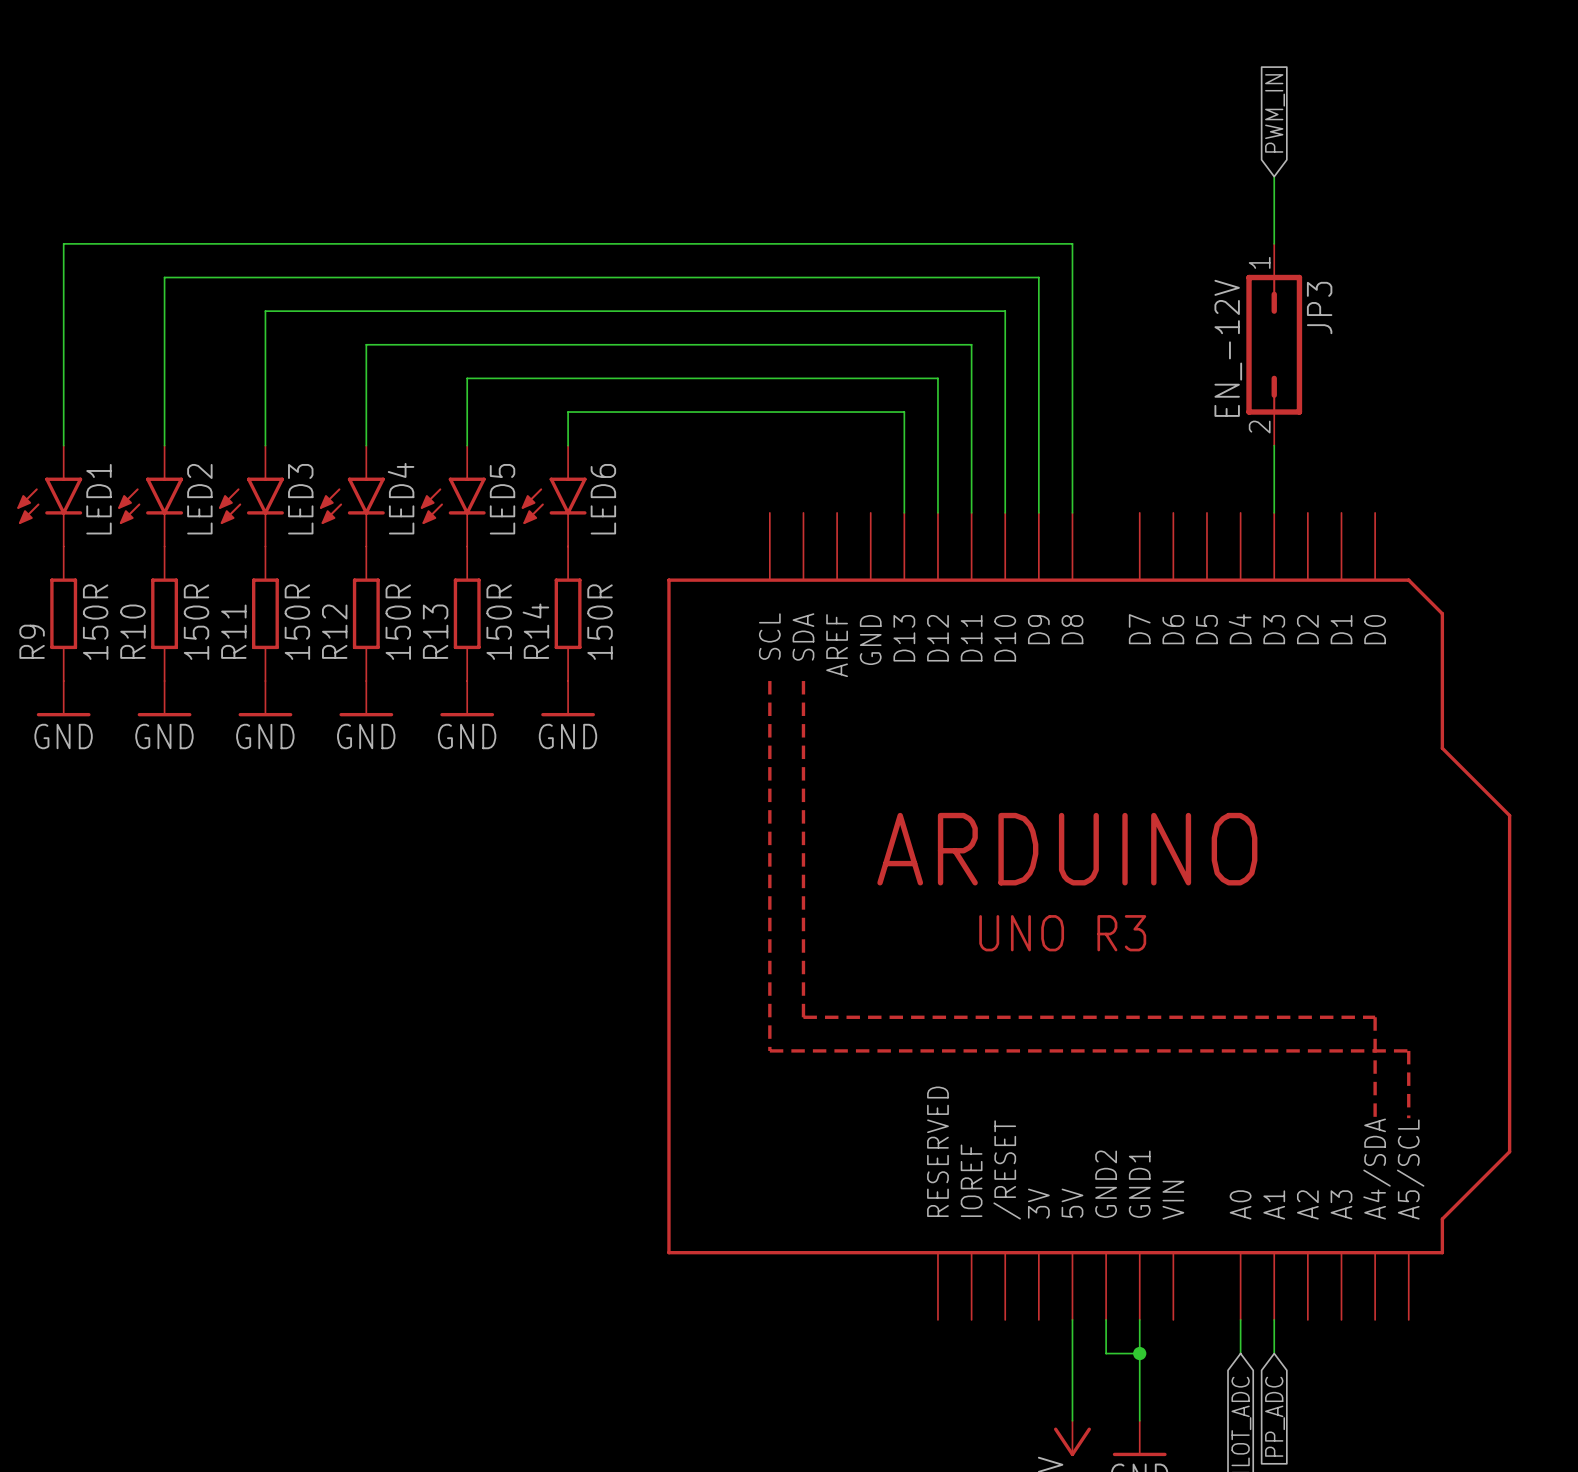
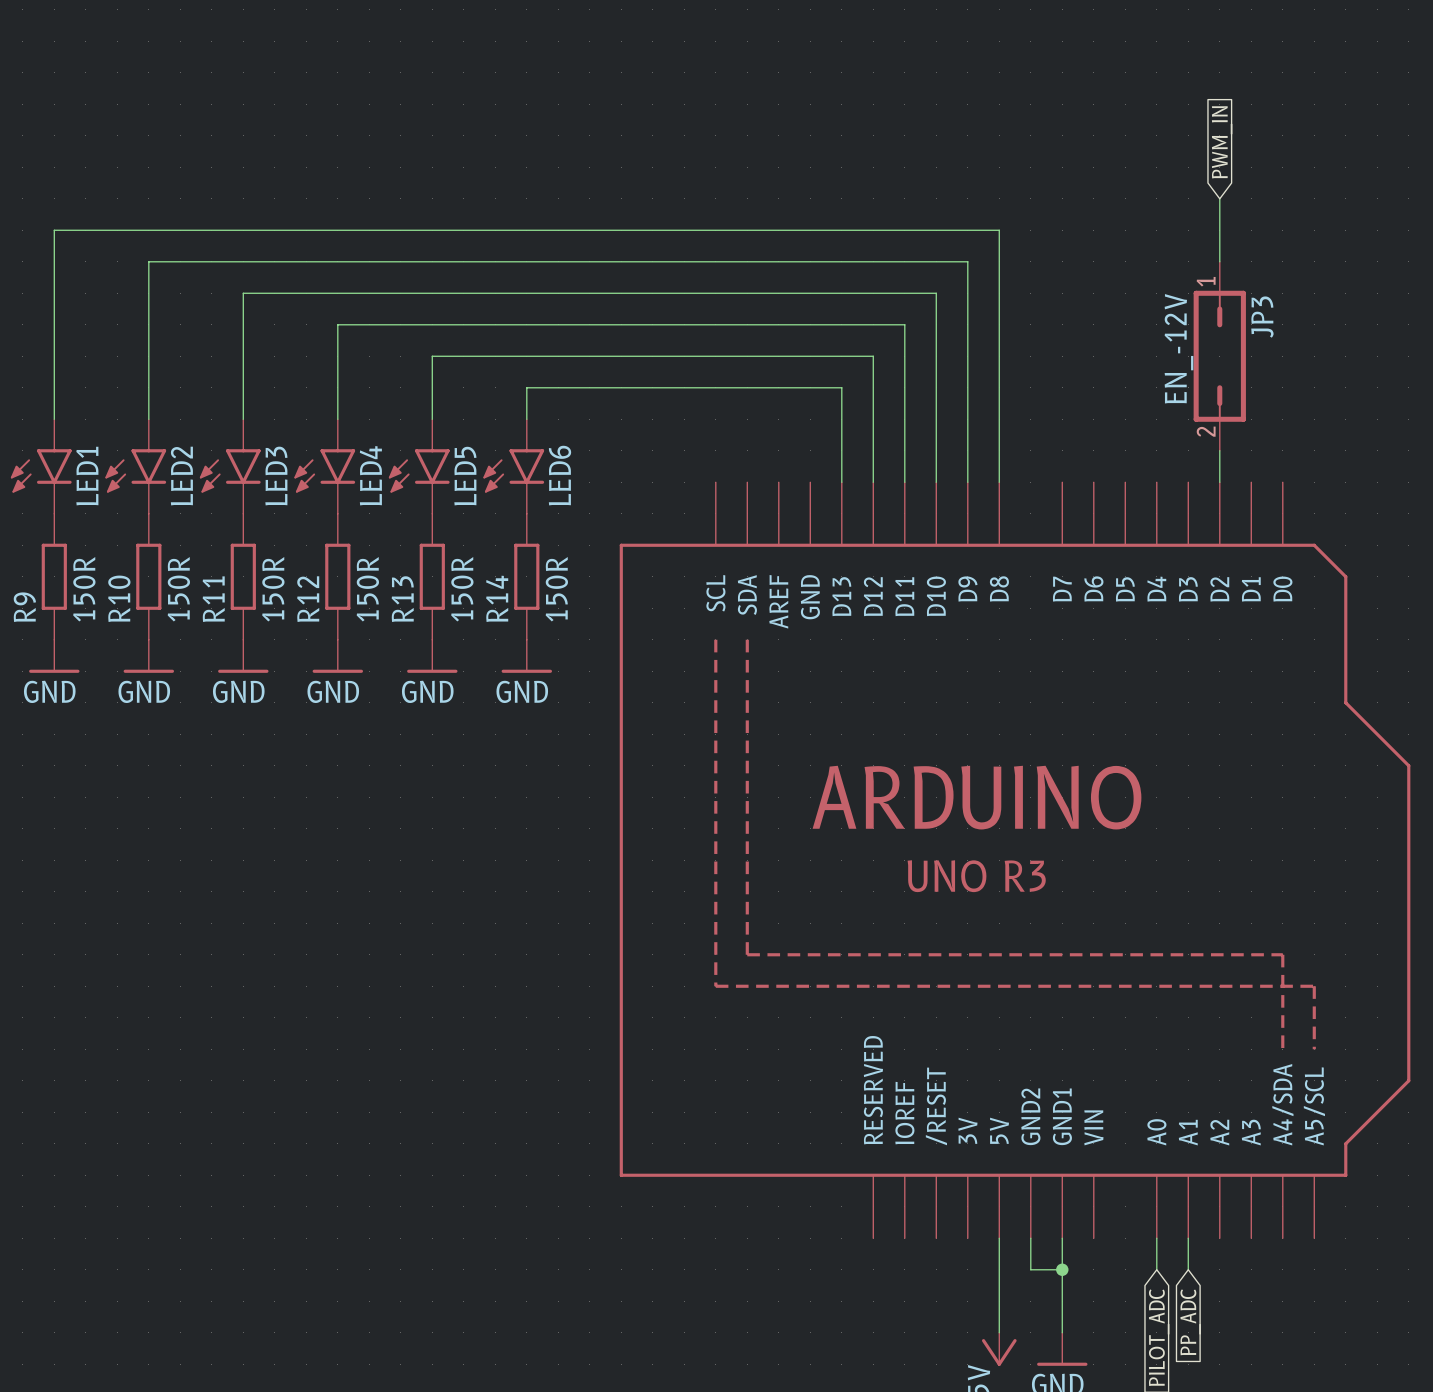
global label position: PWM_IN (1275, 113) -> PWM_IN (1222, 142)
wire: (1274, 176) (1274, 243) -> (1219, 198) (1219, 261)
JP3 position: (1274, 344) -> (1219, 356)
wire: (1274, 445) (1274, 512) -> none
wire: none -> (1219, 450) (1219, 482)

